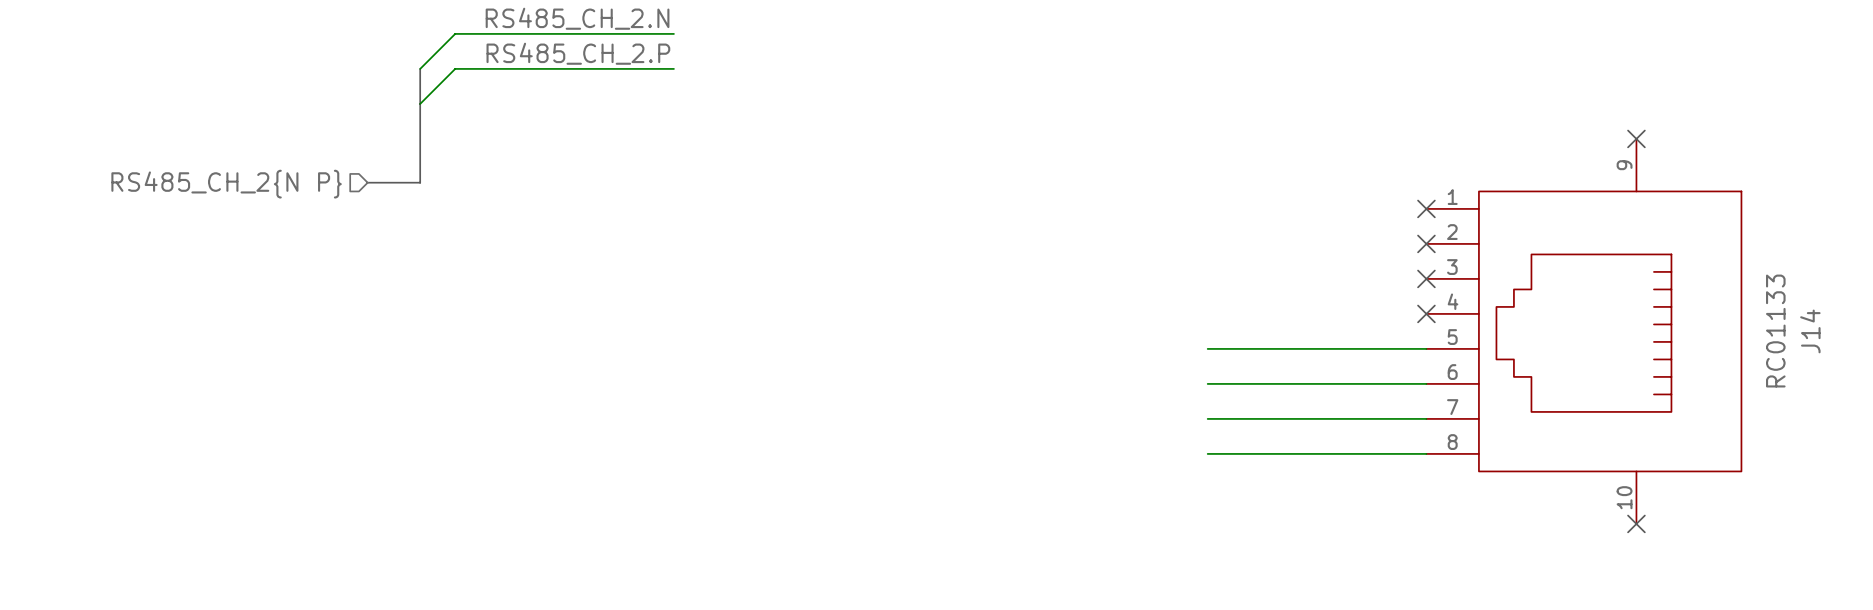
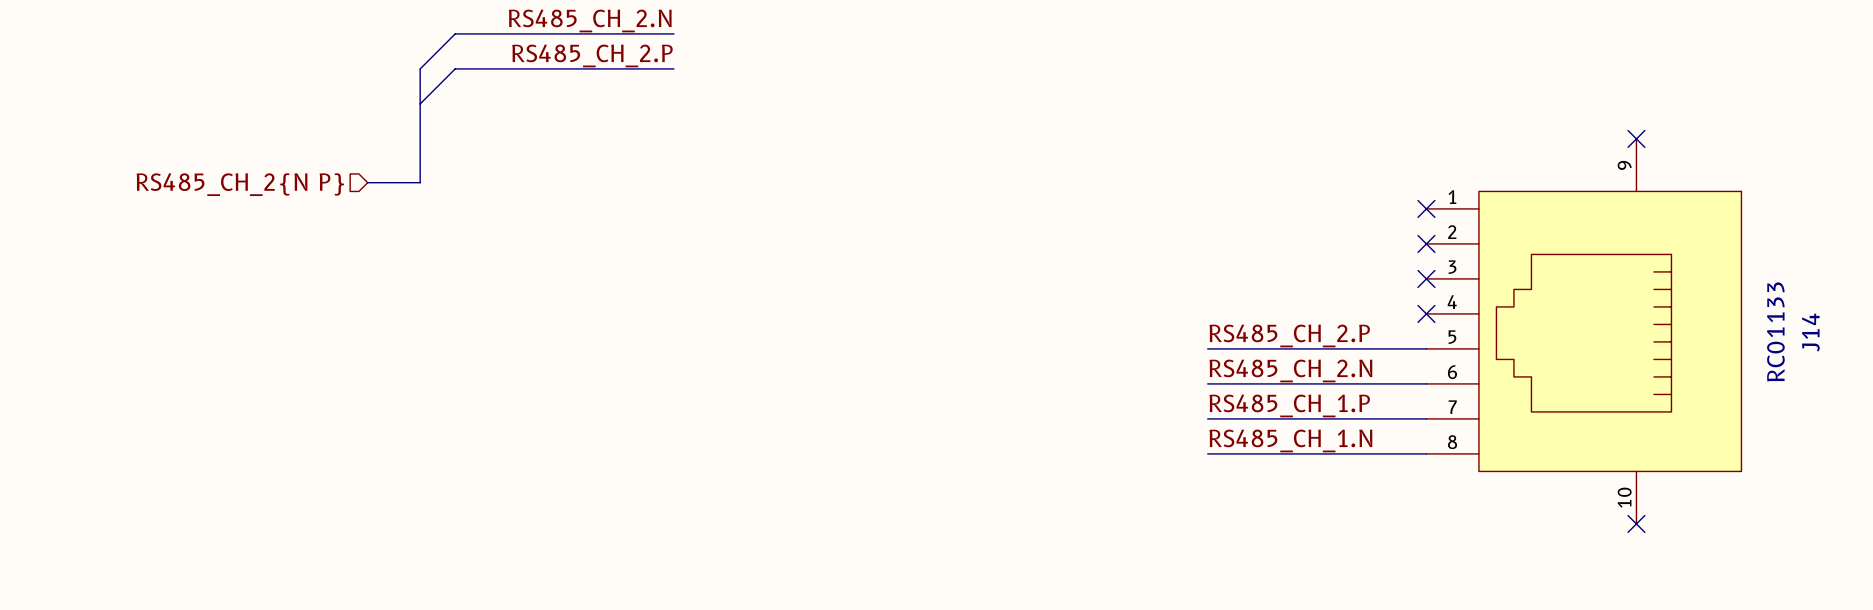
label: none -> RS485_CH_2.P (1289, 335)
label: none -> RS485_CH_2.N (1290, 370)
label: none -> RS485_CH_1.P (1289, 405)
label: none -> RS485_CH_1.N (1290, 440)

